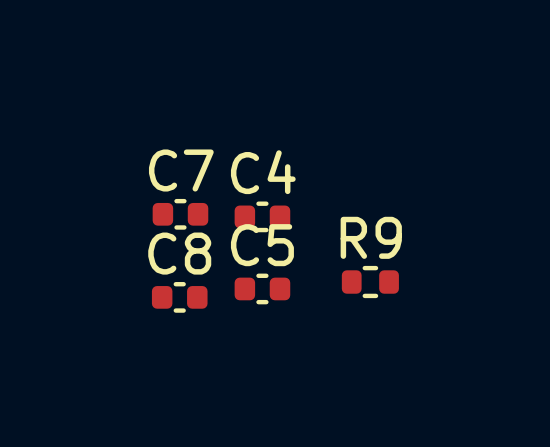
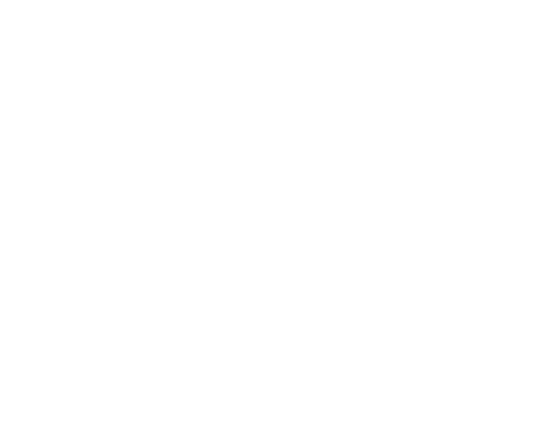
C7: (180, 214) -> none
C4: (262, 216) -> none
R9: (370, 282) -> none
C5: (262, 288) -> none
C8: (179, 297) -> none

